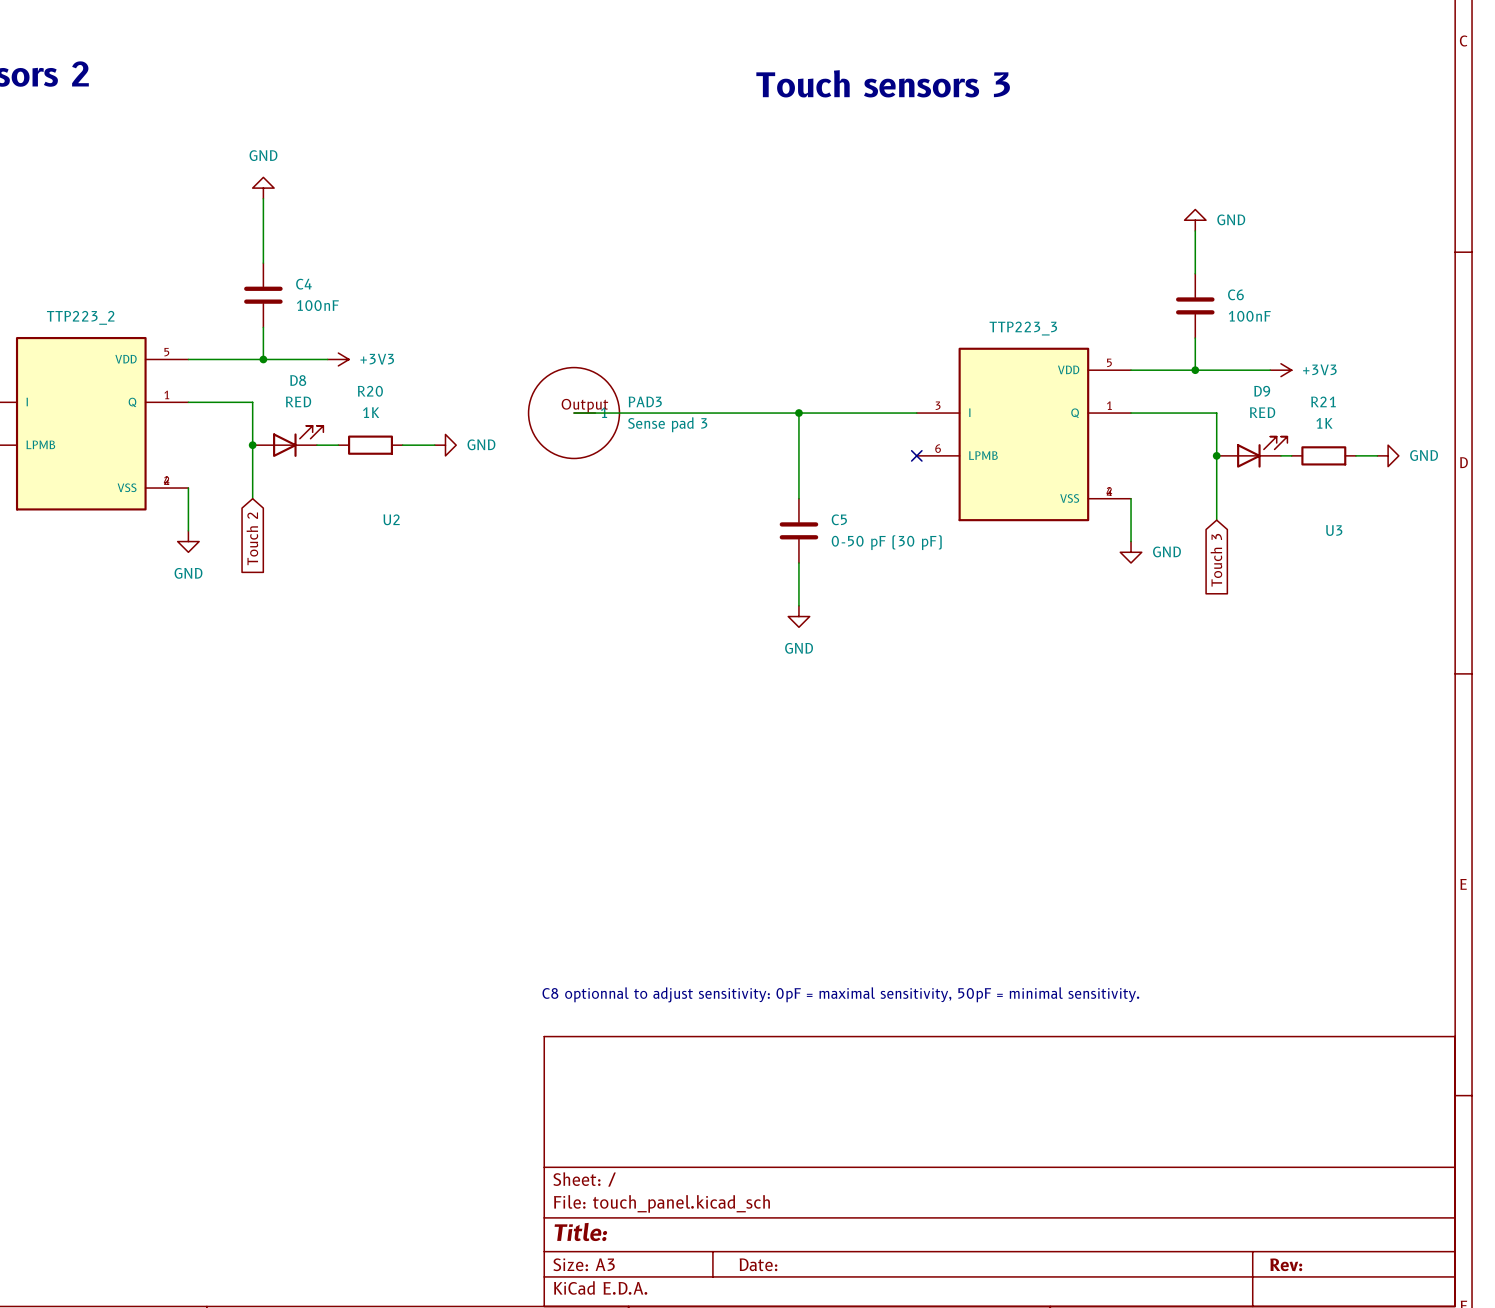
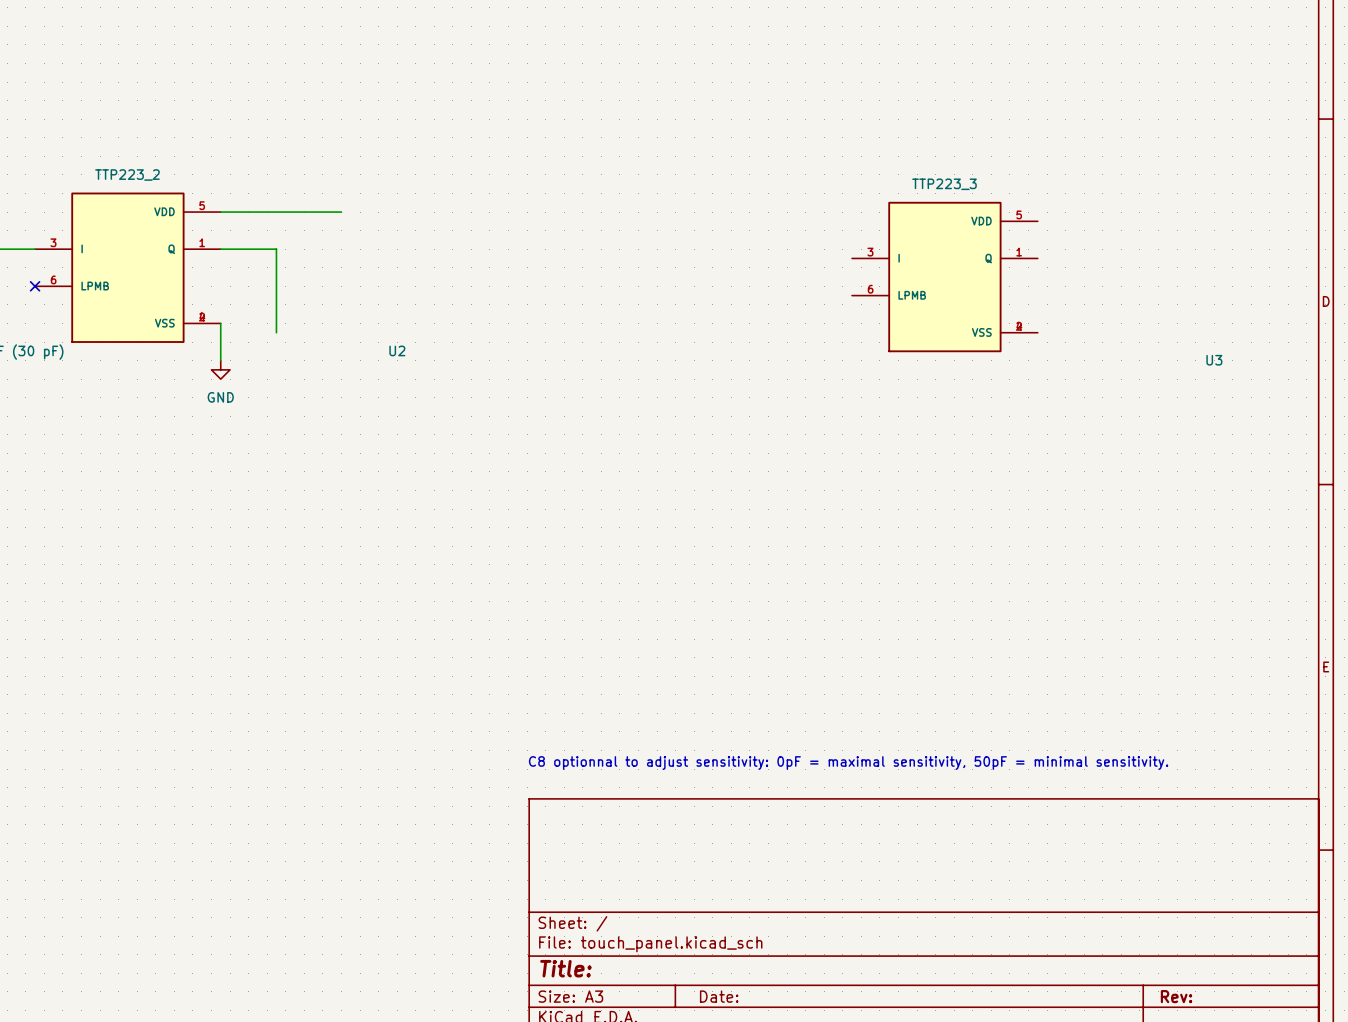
power symbol: GND (263, 188) -> none
wire: (263, 198) (263, 263) -> none
power symbol: GND (1195, 220) -> none
wire: (1195, 230) (1195, 273) -> none
C4: 100nF (263, 295) -> none
C6: 100nF (1195, 305) -> none
wire: (263, 327) (263, 359) -> none
wire: (1195, 338) (1195, 370) -> none
junction: (263, 359) -> none
power symbol: +3V3 (338, 359) -> none
wire: (1131, 370) (1270, 370) -> none
junction: (1195, 370) -> none
power symbol: +3V3 (1280, 370) -> none
wire: (574, 413) (916, 413) -> none
PAD3: Sense pad 3 (574, 413) -> none
wire: (798, 413) (798, 498) -> none
junction: (798, 413) -> none
wire: (1131, 413) (1216, 413) (1216, 520) -> none
D8: RED (288, 441) -> none
junction: (252, 445) -> none
wire: (316, 445) (338, 445) -> none
R20: 1K (370, 445) -> none
wire: (402, 445) (434, 445) -> none
power symbol: GND (445, 445) -> none
D9: RED (1252, 452) -> none
no-connect mark: (916, 455) -> none
junction: (1216, 455) -> none
wire: (1280, 455) (1291, 455) -> none
R21: 1K (1323, 455) -> none
wire: (1355, 455) (1377, 455) -> none
power symbol: GND (1388, 455) -> none
wire: (1131, 498) (1131, 541) -> none
C5: 0-50 pF (30 pF) (798, 530) -> none
global label: Touch 2 (252, 538) -> none
power symbol: GND (1131, 552) -> none
global label: Touch 3 (1216, 560) -> none
wire: (798, 562) (798, 605) -> none
power symbol: GND (798, 616) -> none

